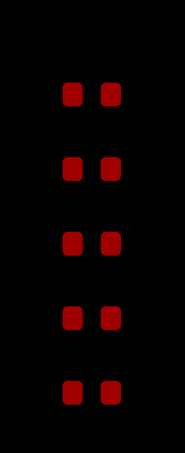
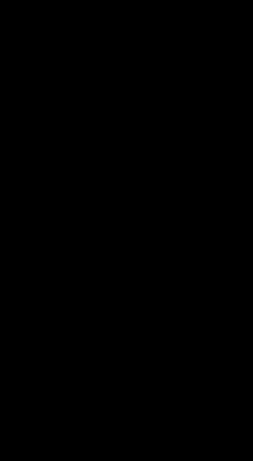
part: (91, 94) -> none
part: (91, 169) -> none
part: (91, 243) -> none
part: (91, 318) -> none
part: (91, 392) -> none

